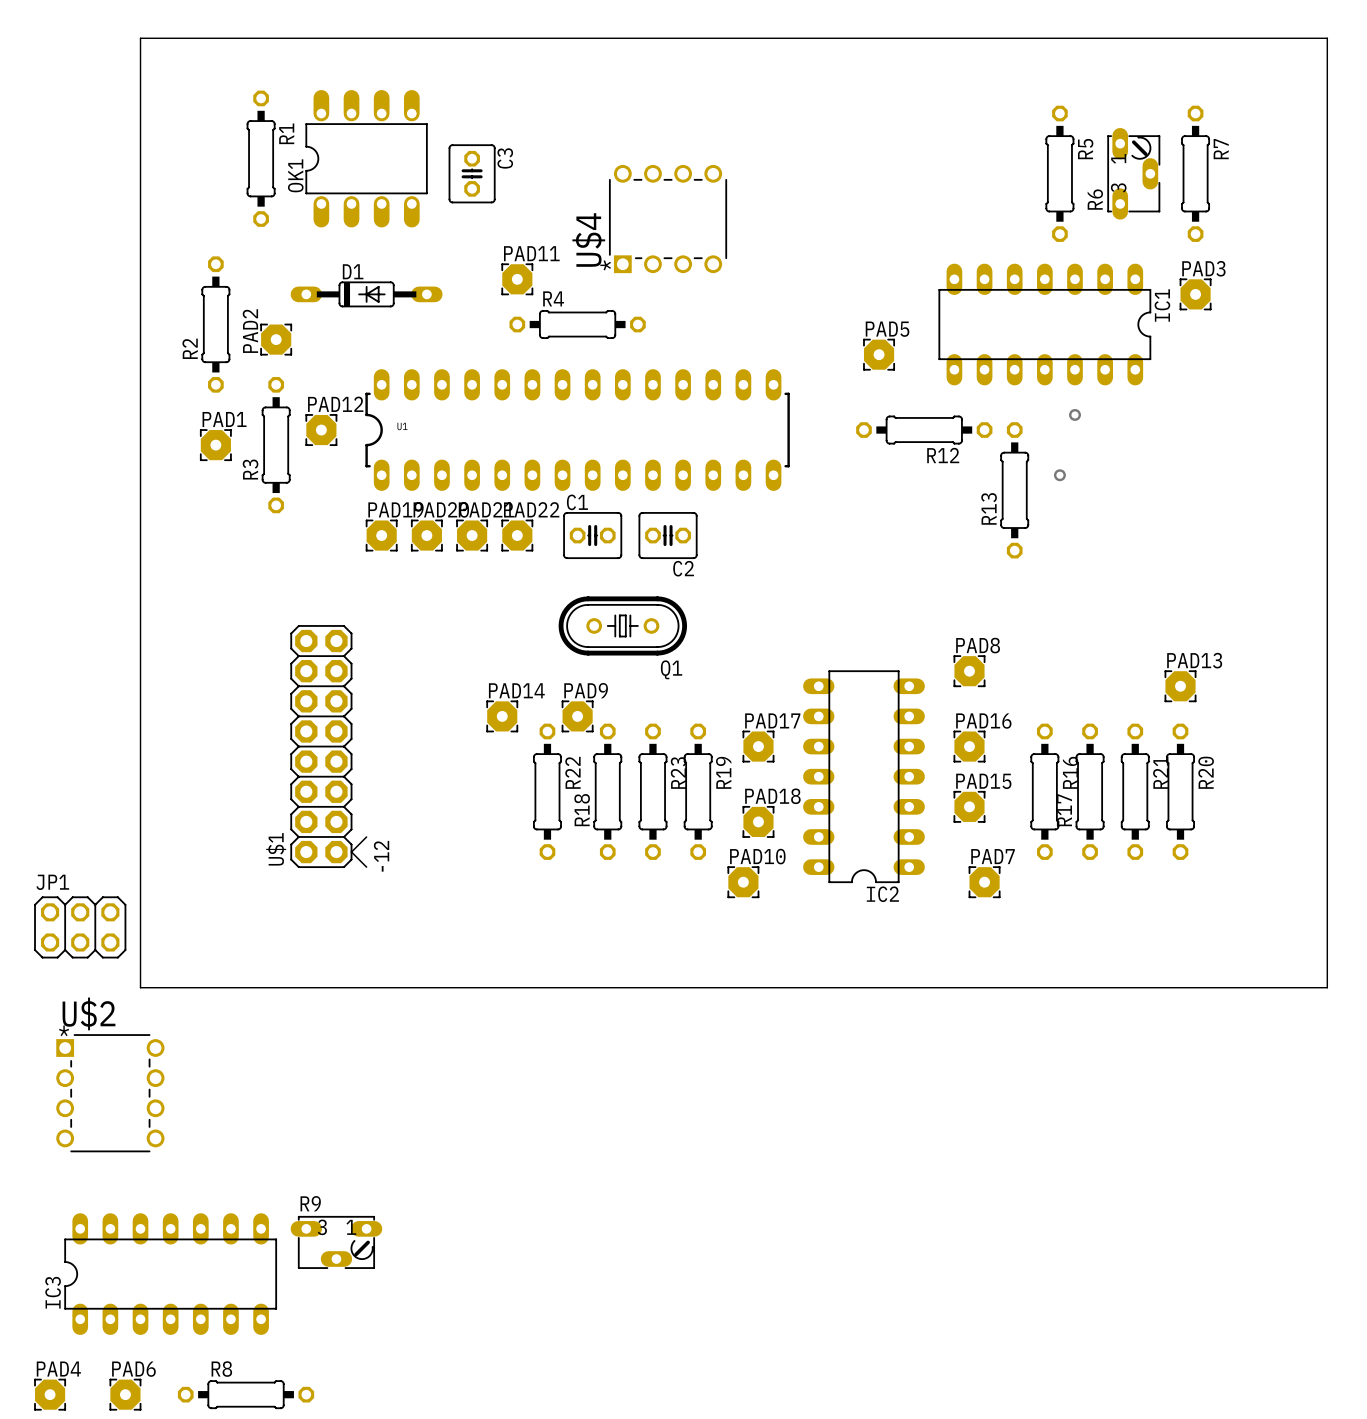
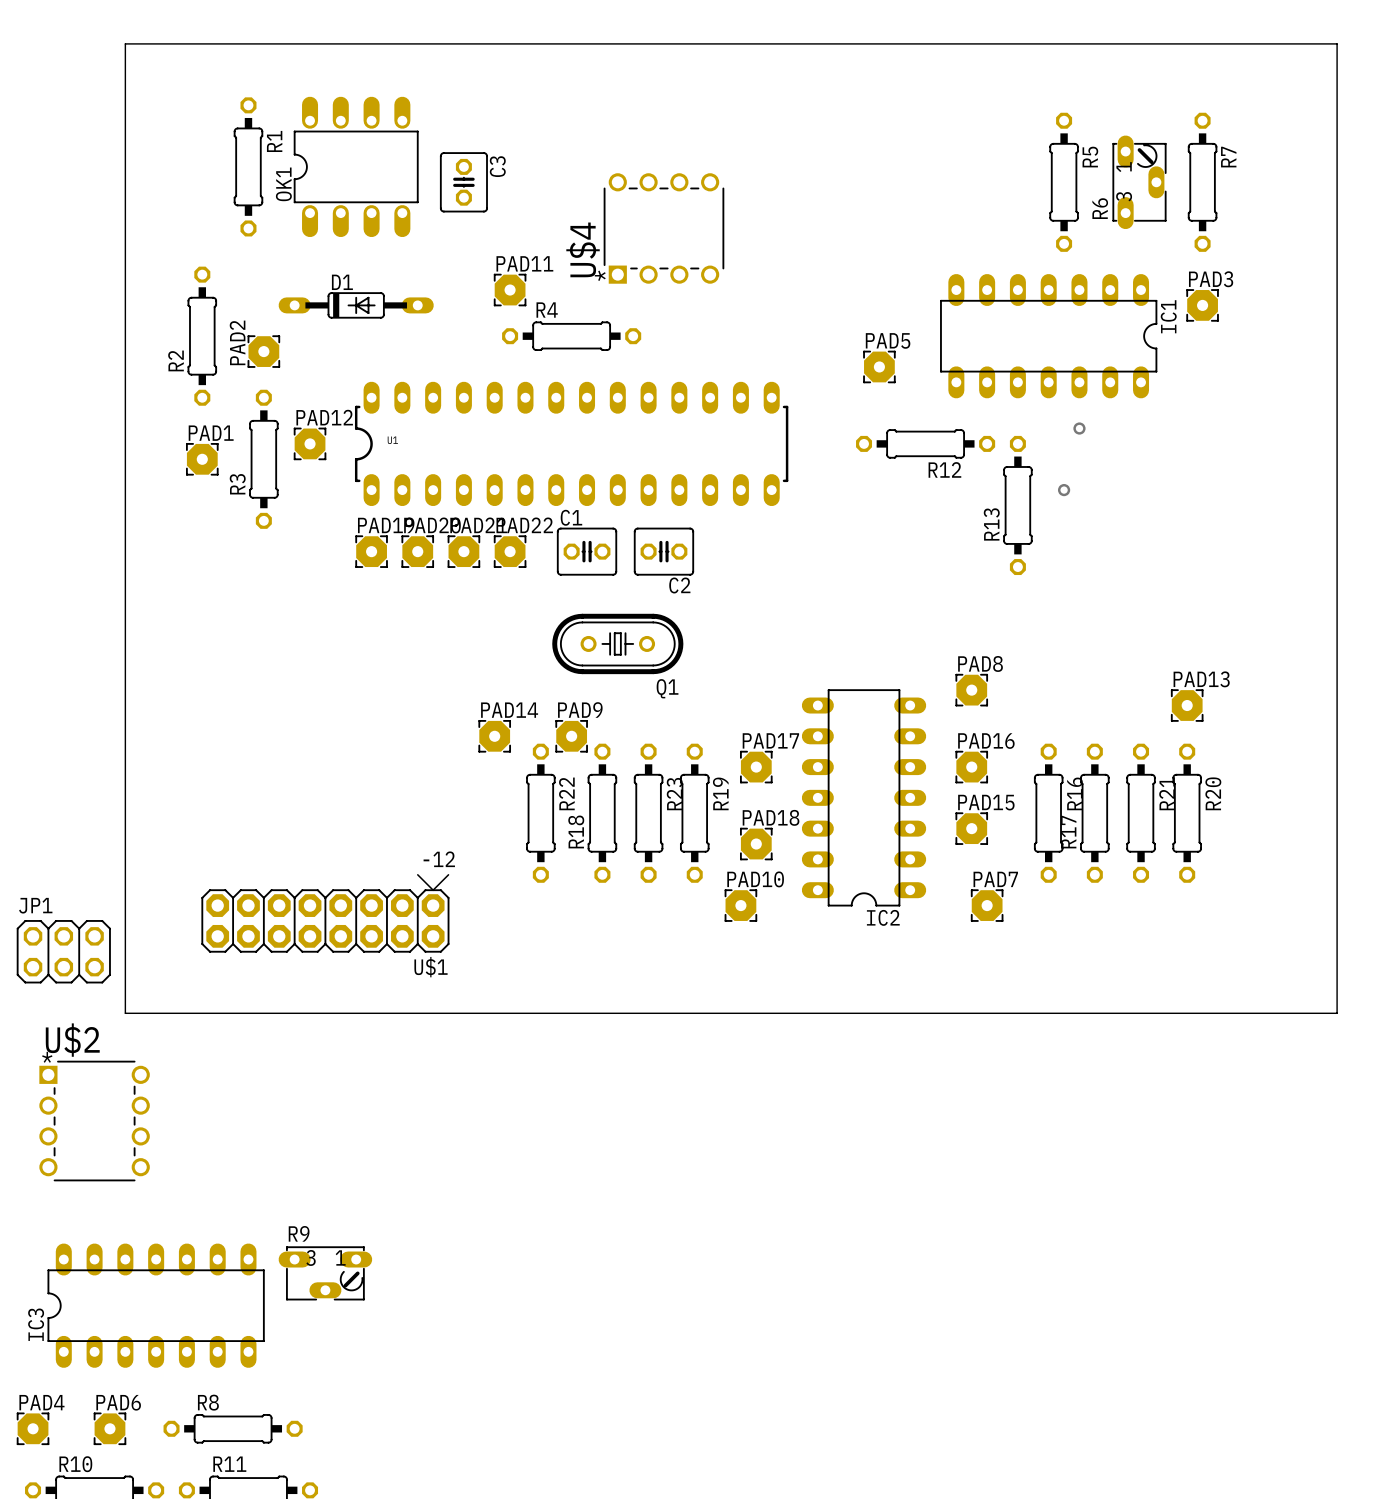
U$1 footprint: [290, 625, 368, 869] -> [201, 874, 450, 953]
U$1 name position: U$1 (276, 849) -> U$1 (431, 967)

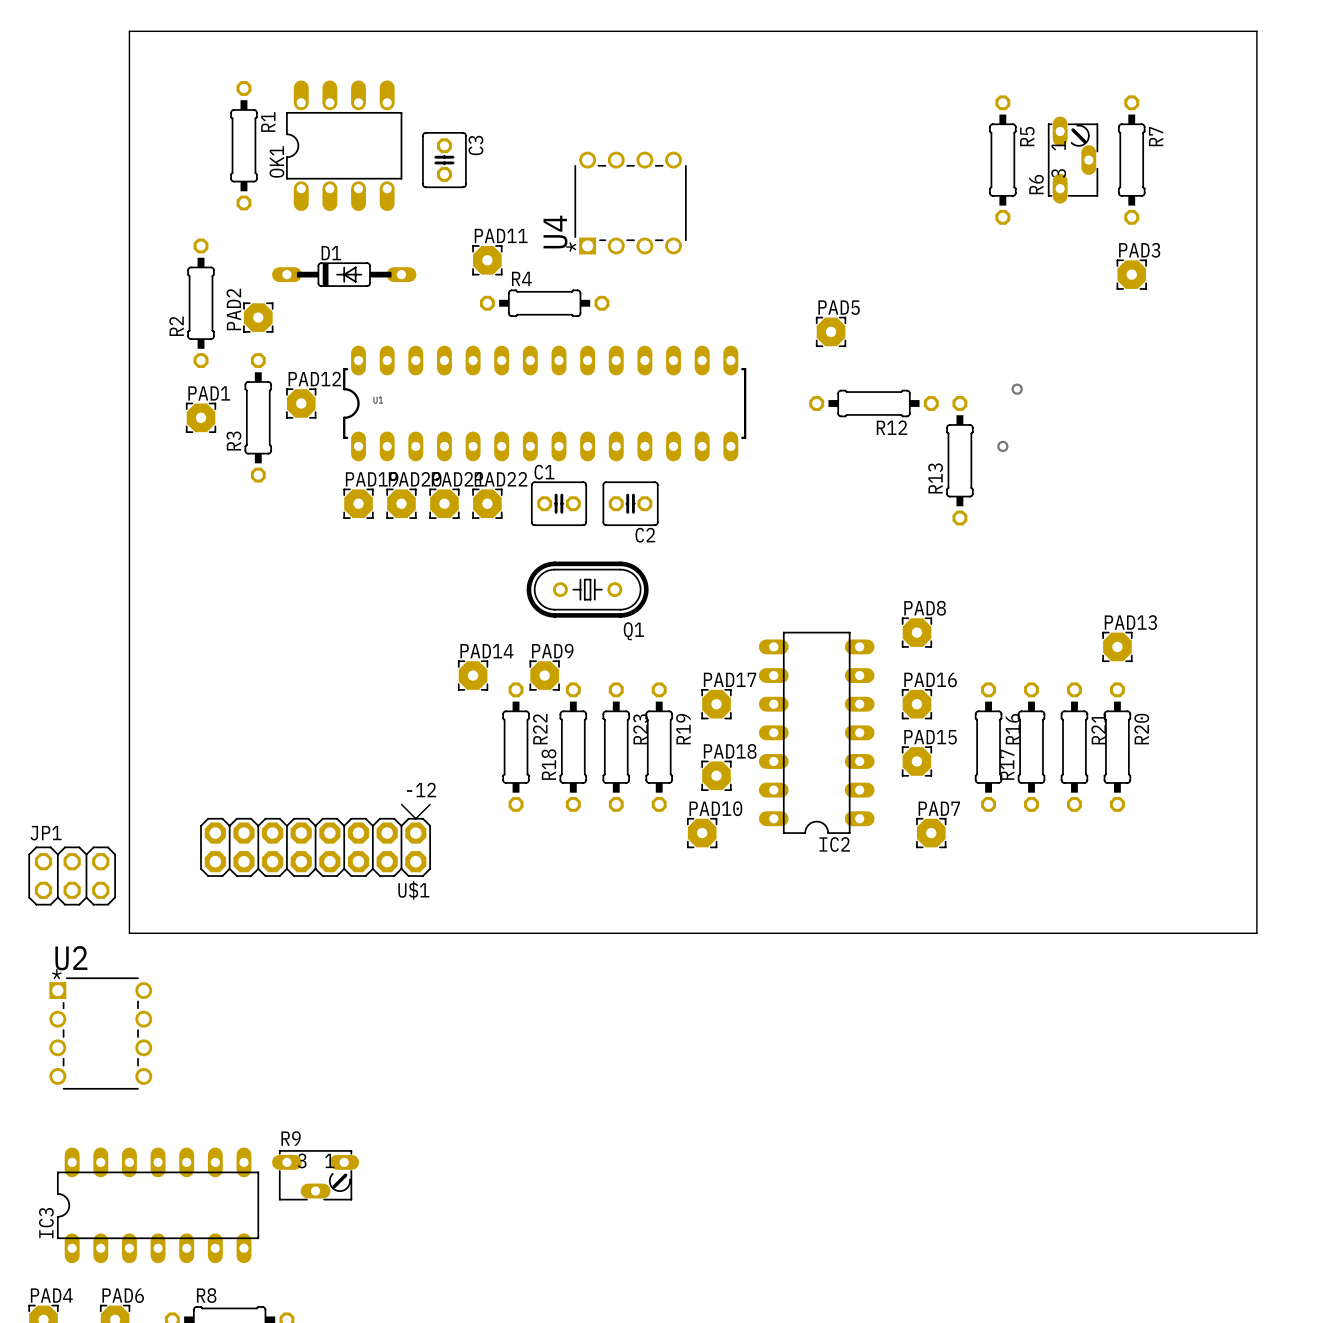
U$4 name: U$4 (583, 249) -> U4 (555, 232)
IC1: (1048, 336) -> none
U$2 name: U$2 (72, 1040) -> U2 (71, 958)

